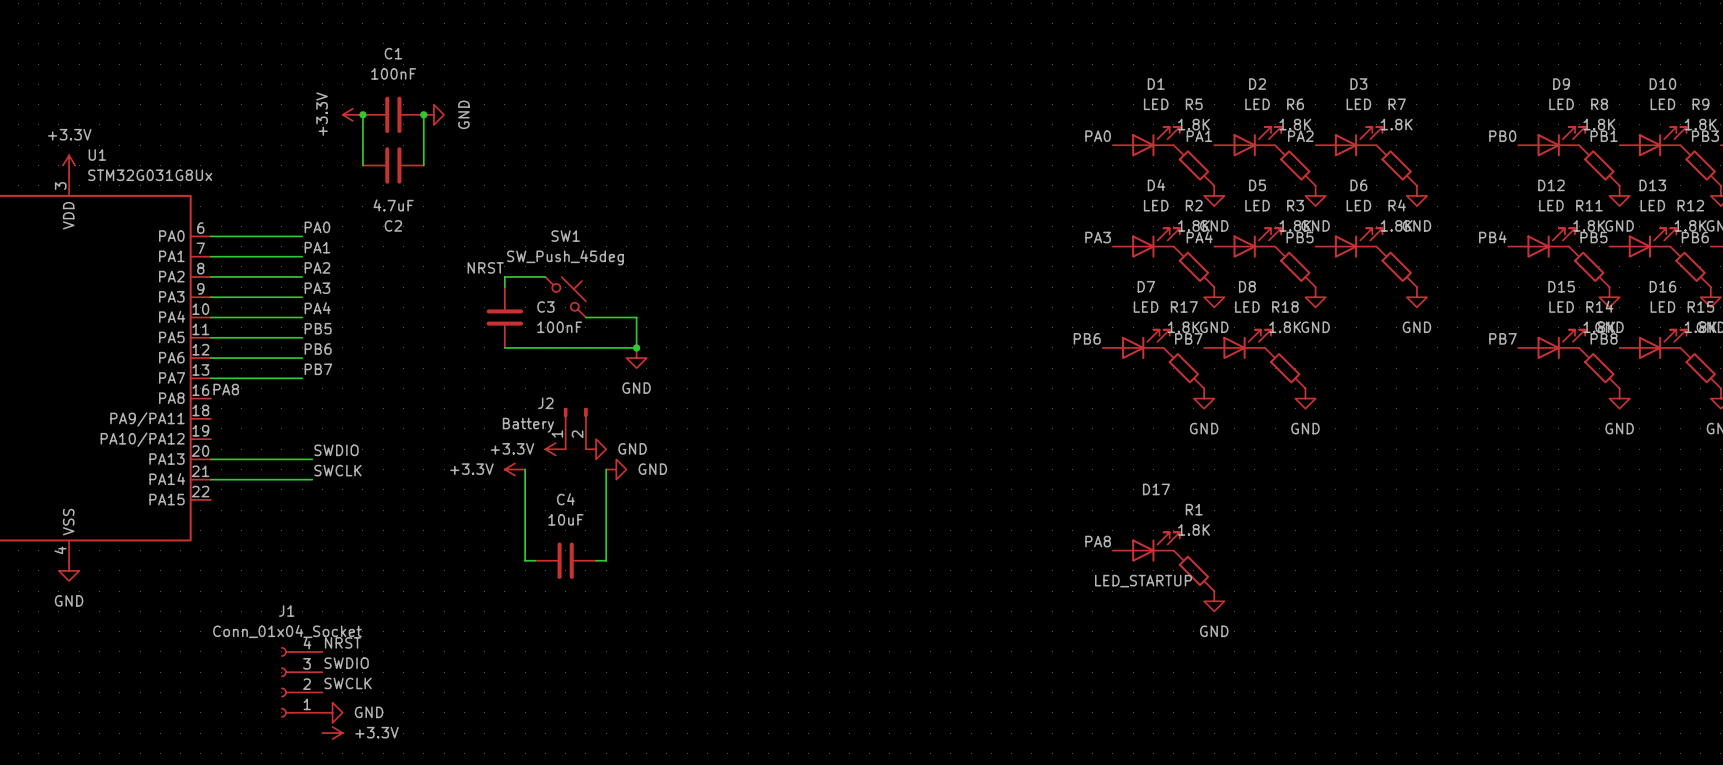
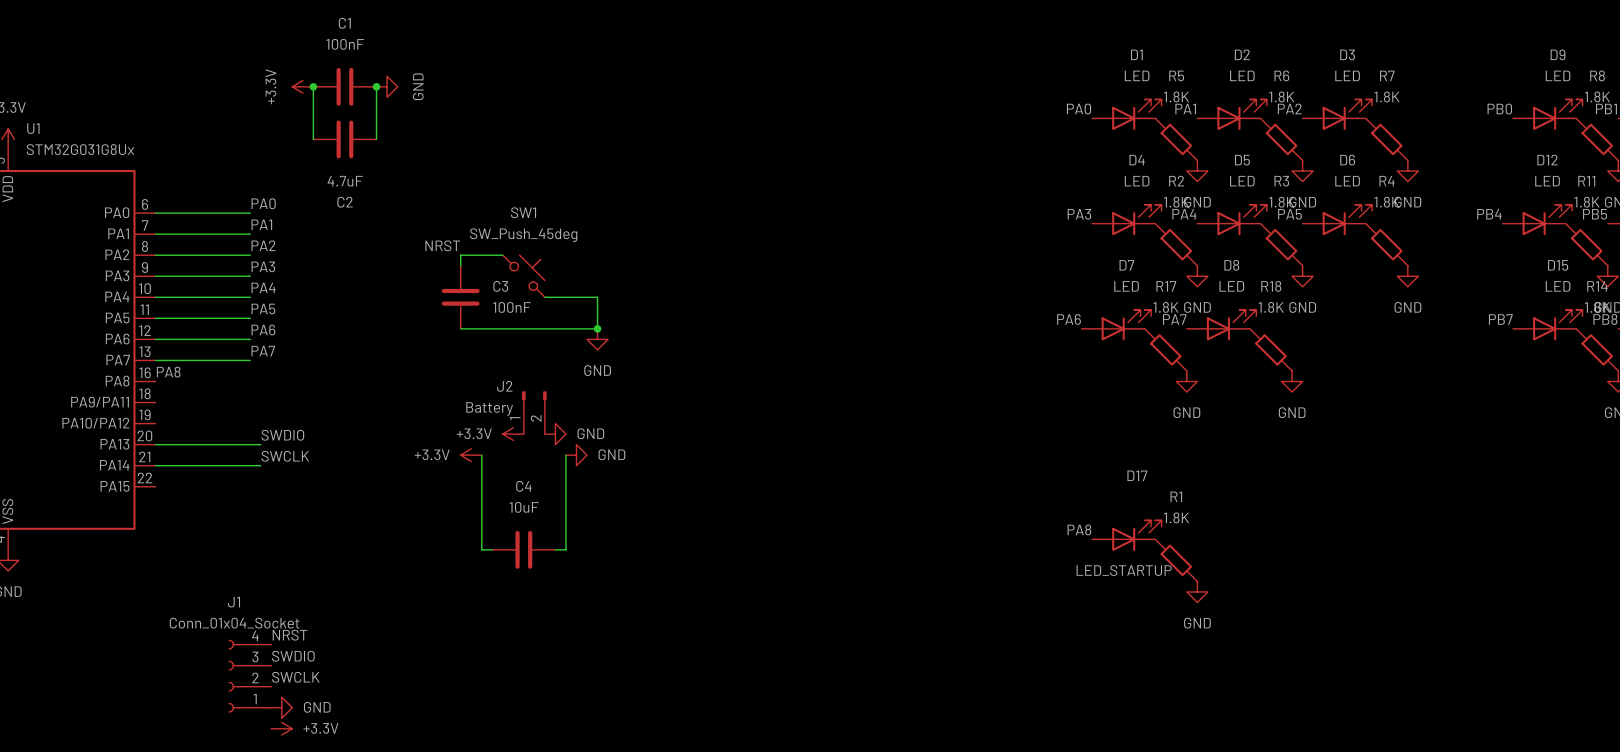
label: PB5 (1300, 237) -> PA5 (1290, 214)
label: PB5 (318, 328) -> PA5 (263, 309)
label: PB6 (1087, 338) -> PA6 (1069, 319)
label: PB7 (1188, 338) -> PA7 (1174, 319)
label: PB6 (318, 349) -> PA6 (263, 330)
label: PB7 (318, 369) -> PA7 (263, 351)

